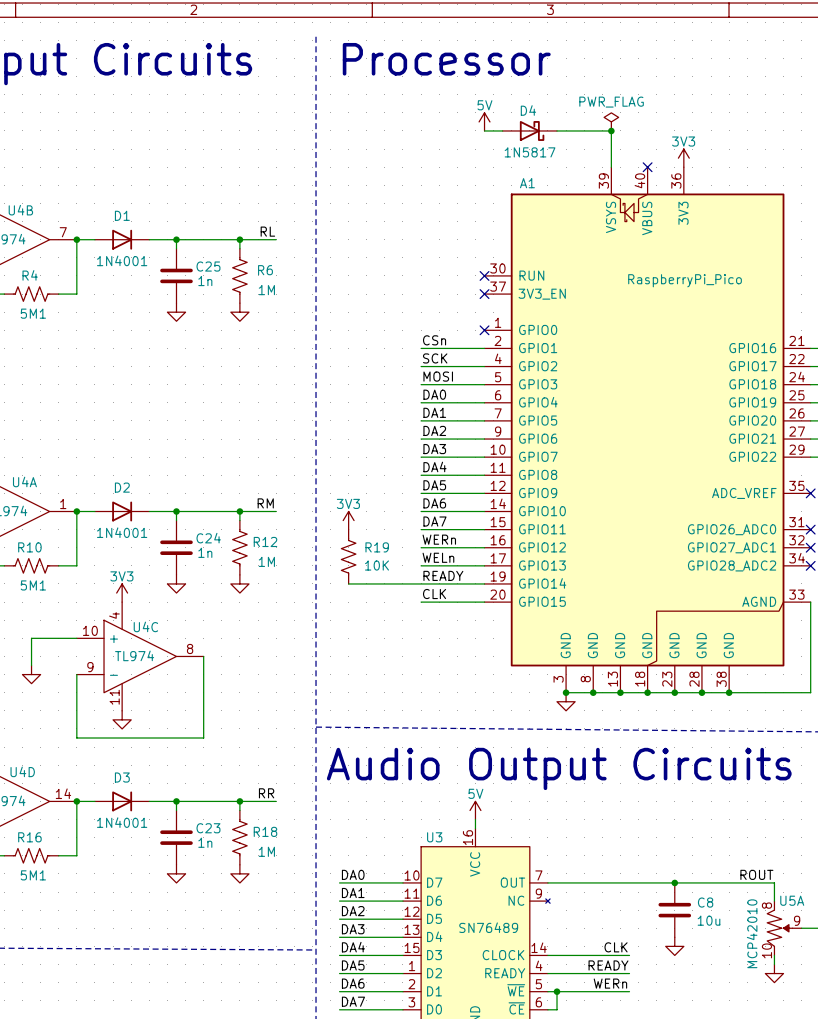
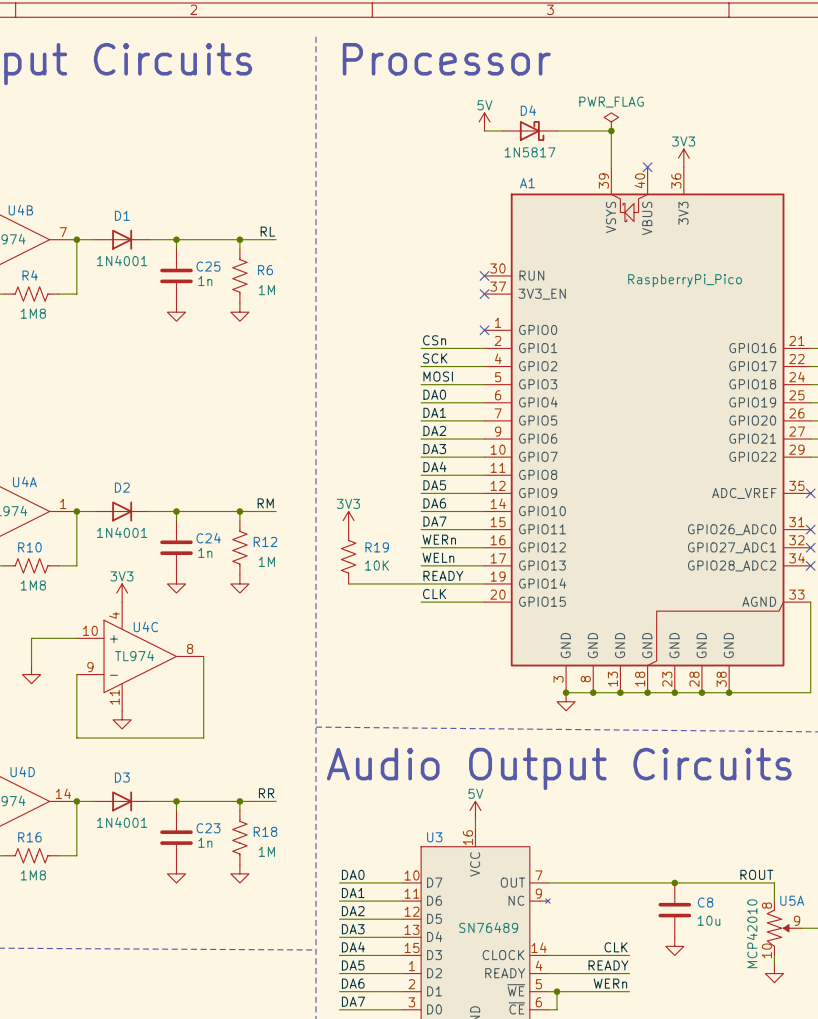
R4 value: 5M1 (33, 313) -> 1M8 (33, 313)
R10 value: 5M1 (33, 585) -> 1M8 (33, 585)
R16 value: 5M1 (33, 875) -> 1M8 (33, 875)

